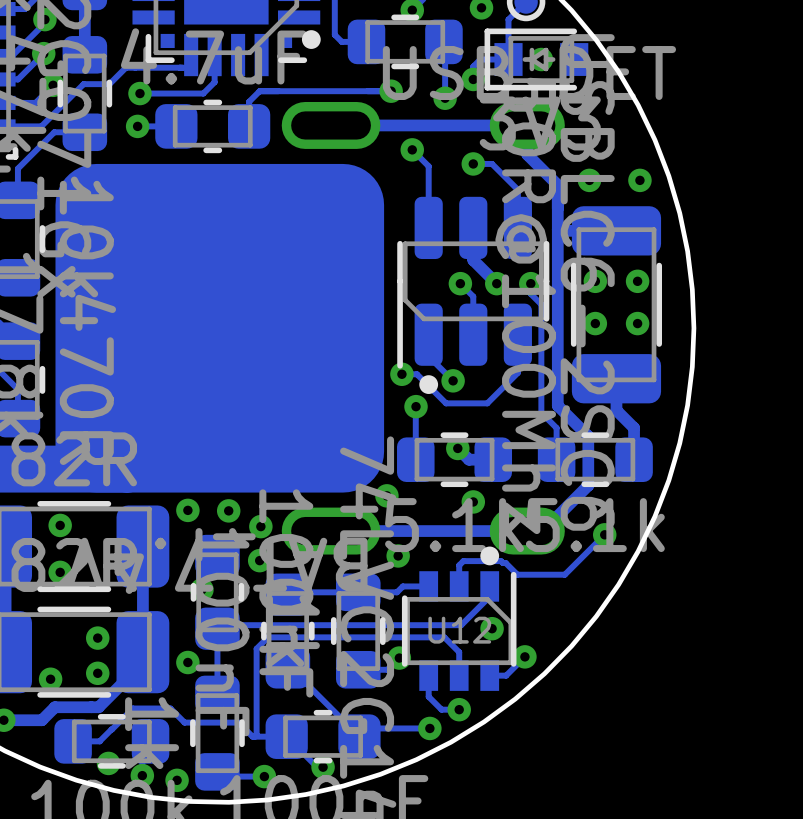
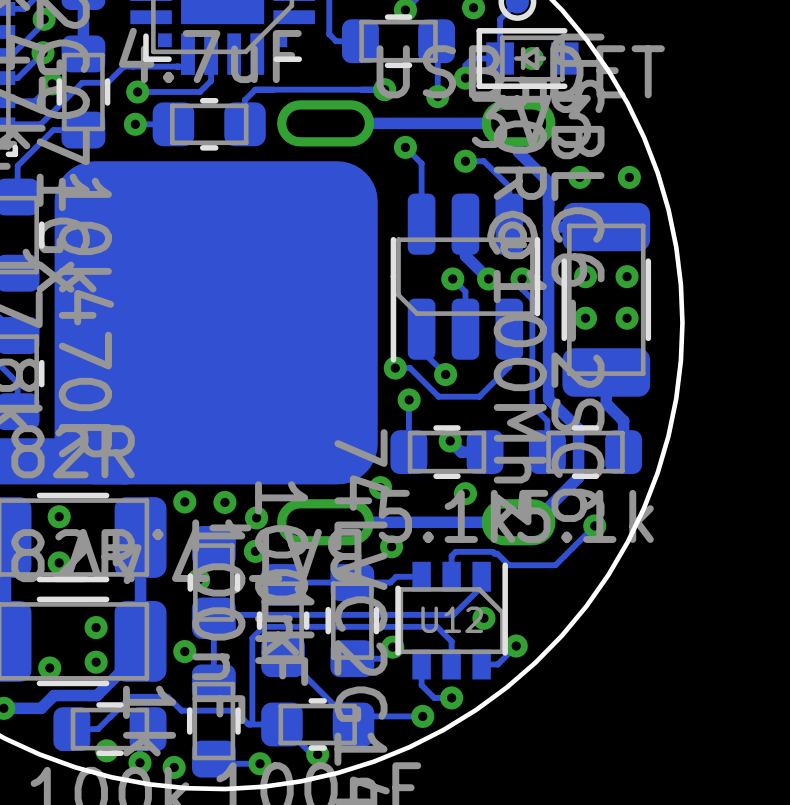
drawing: [301, 30, 321, 49] -> none
drawing: [419, 375, 439, 394] -> none
drawing: [480, 546, 500, 566] -> none

